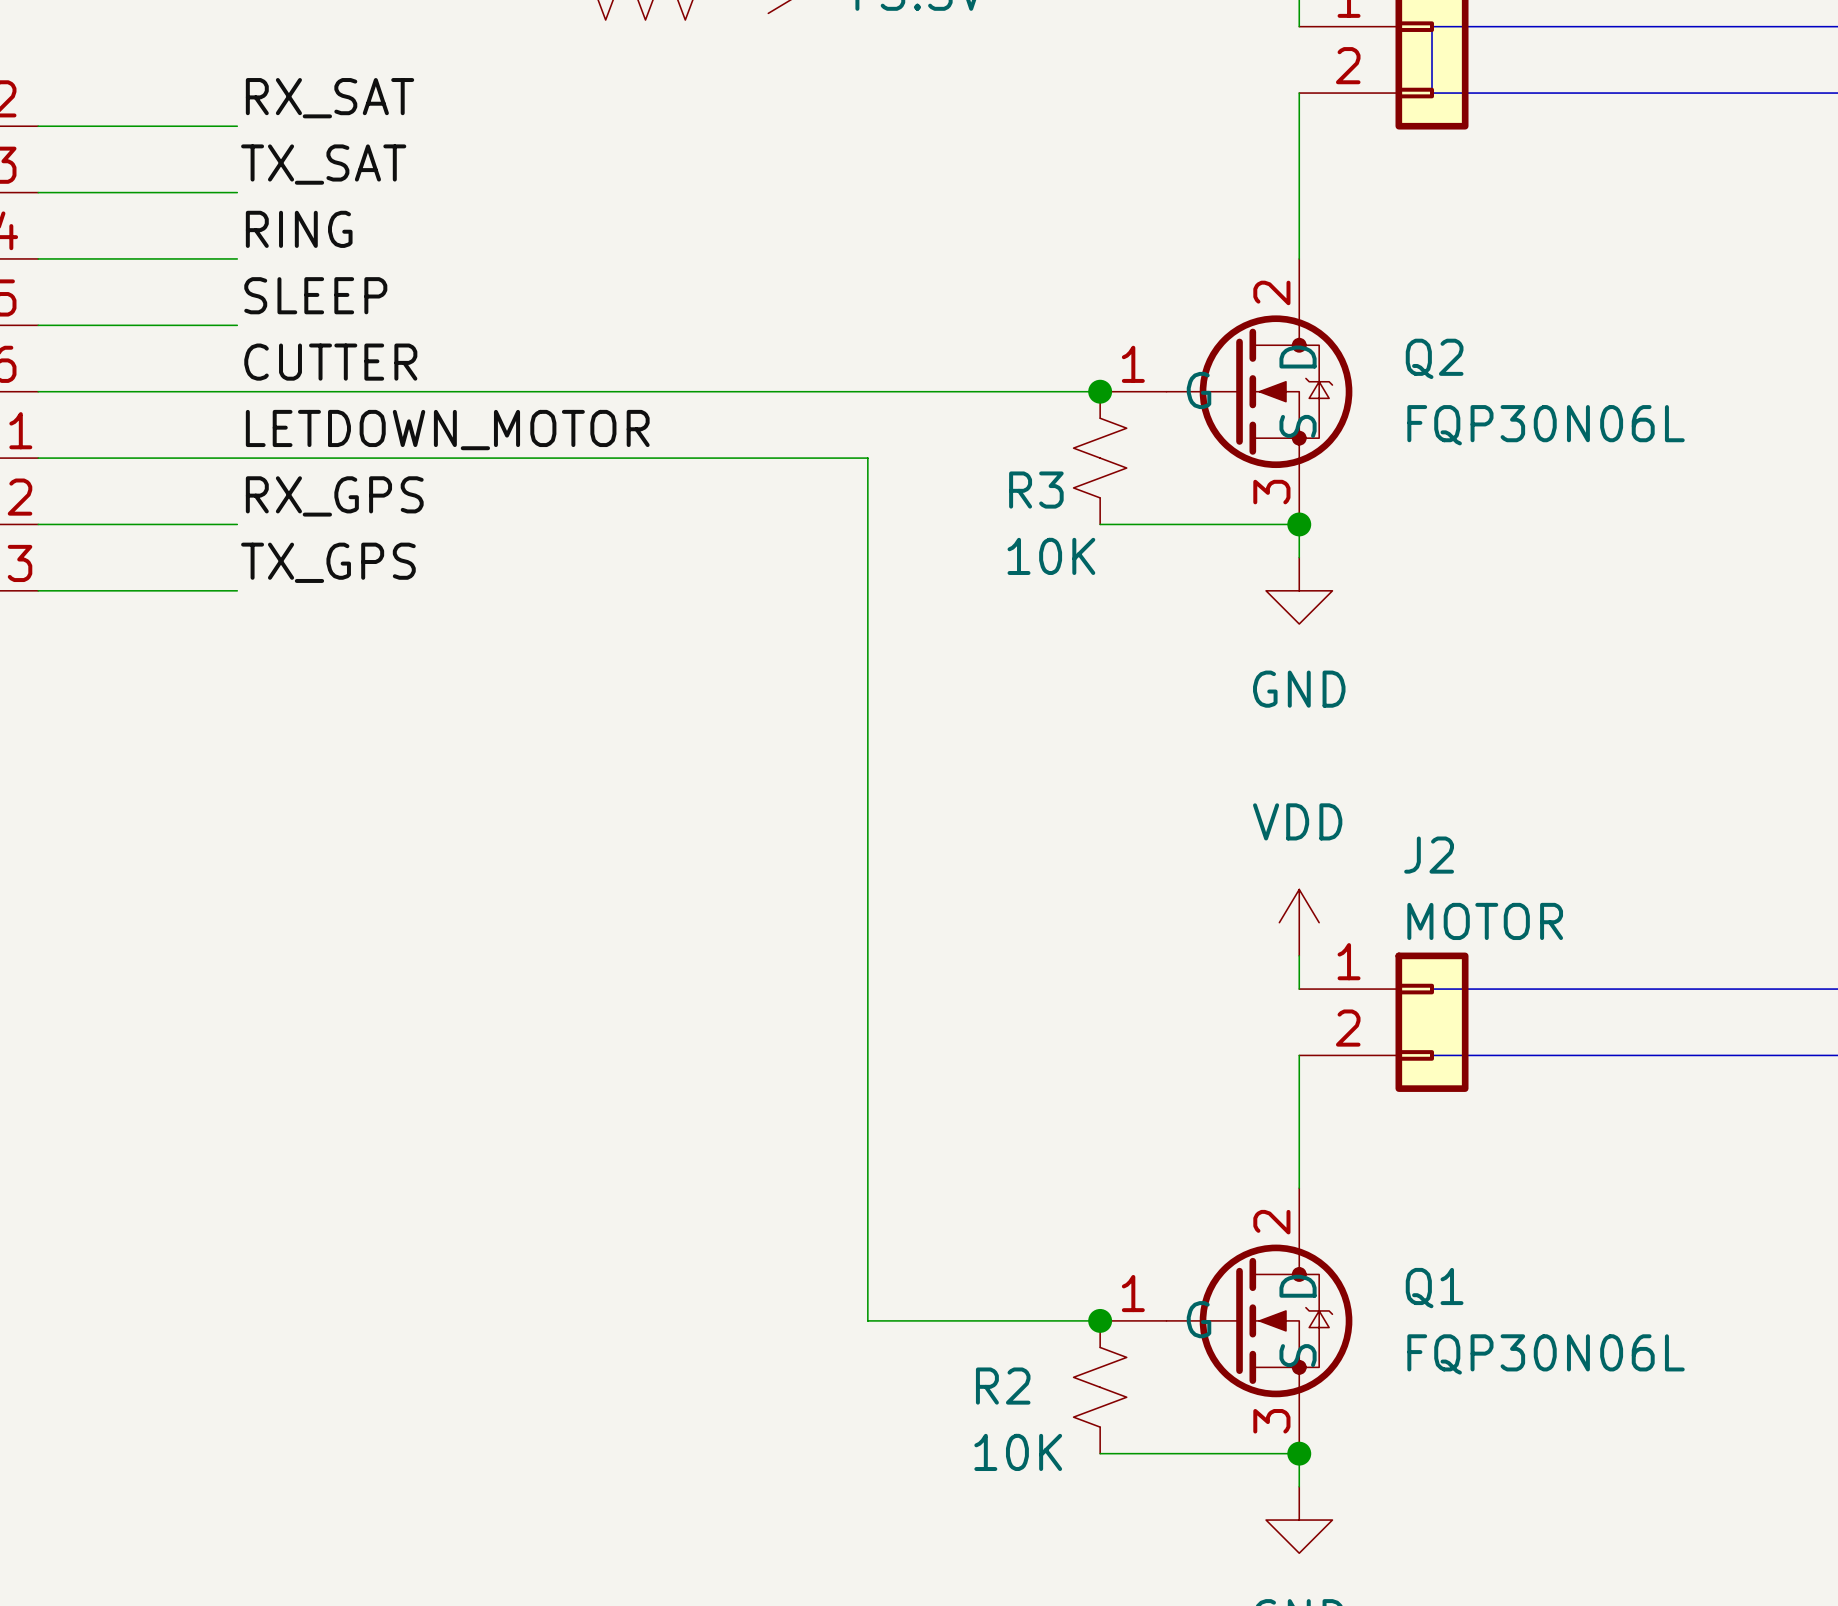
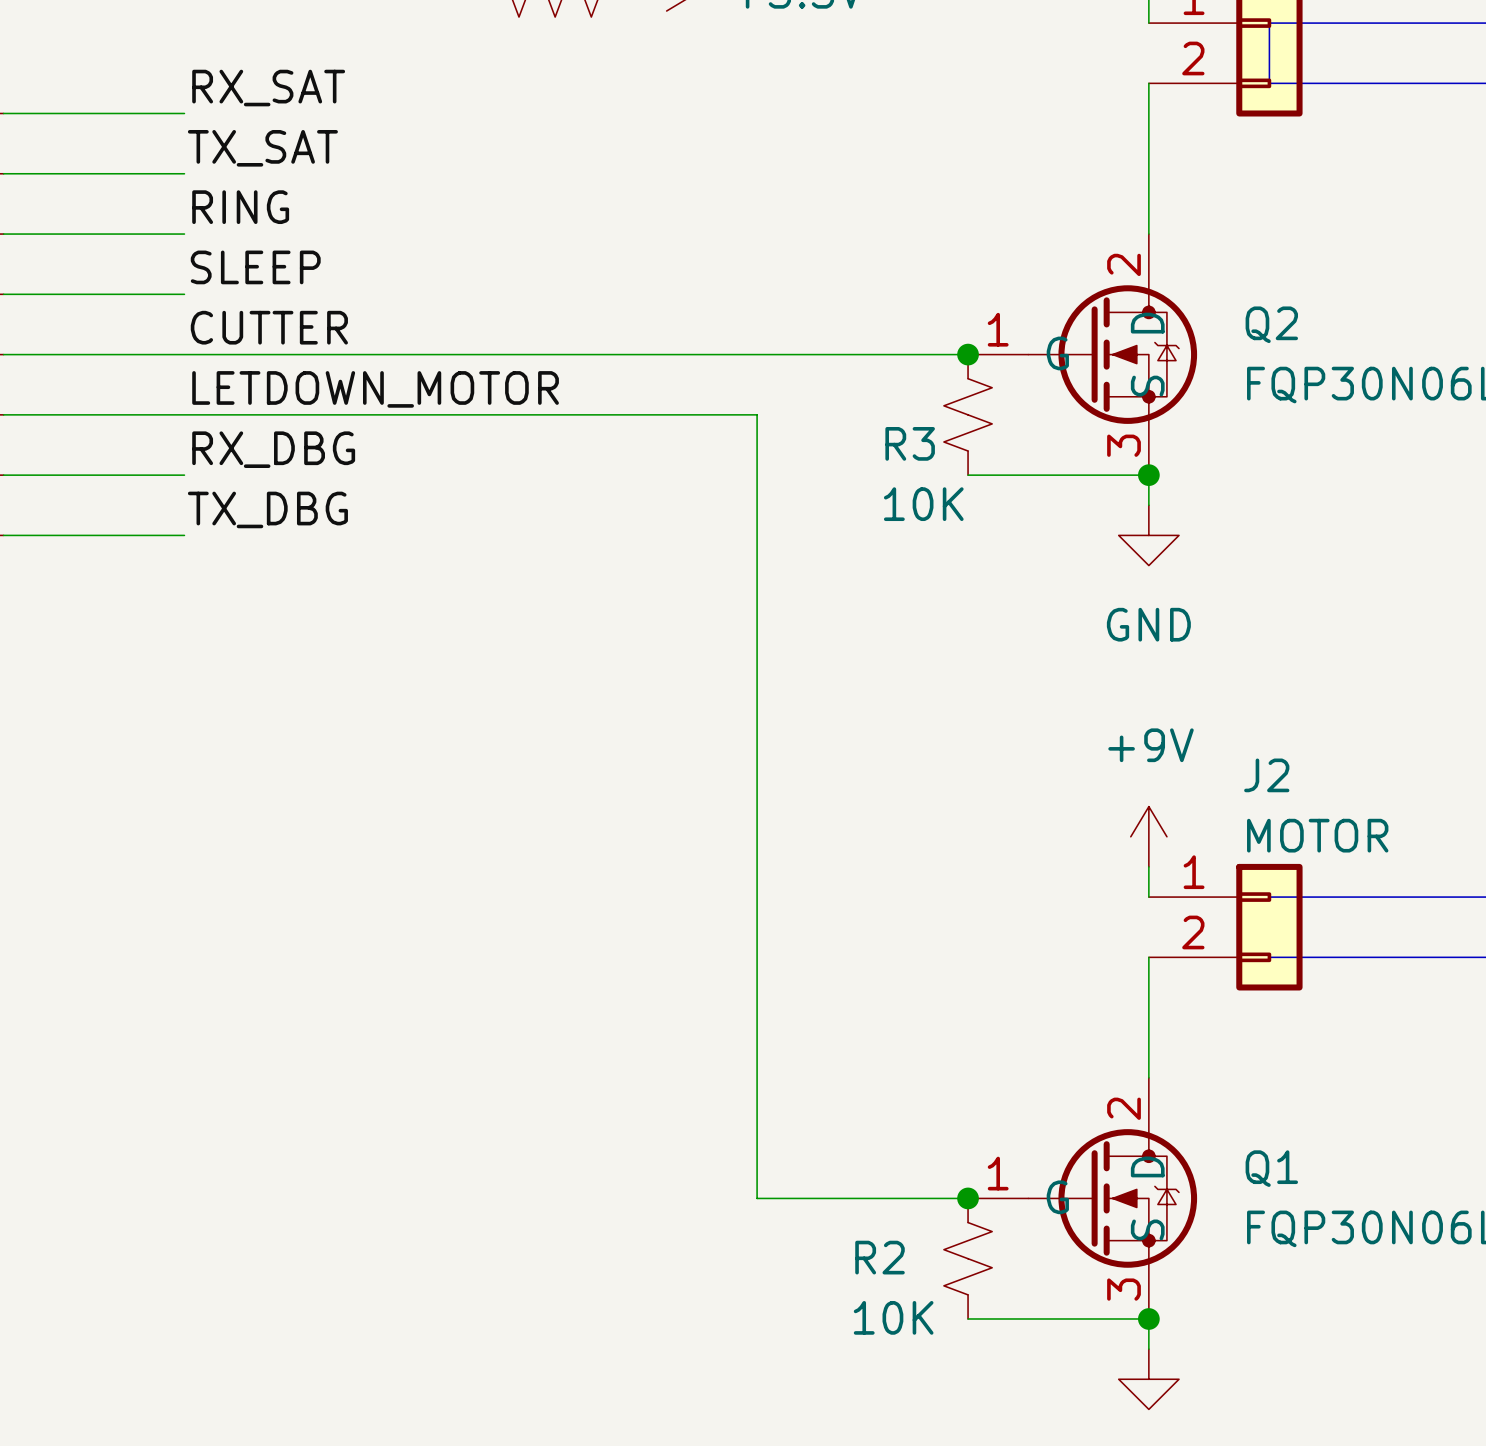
label: RX_GPS (334, 496) -> RX_DBG (273, 449)
label: TX_GPS (328, 562) -> TX_DBG (267, 509)
power symbol: VDD (1299, 922) -> +9V (1148, 836)

